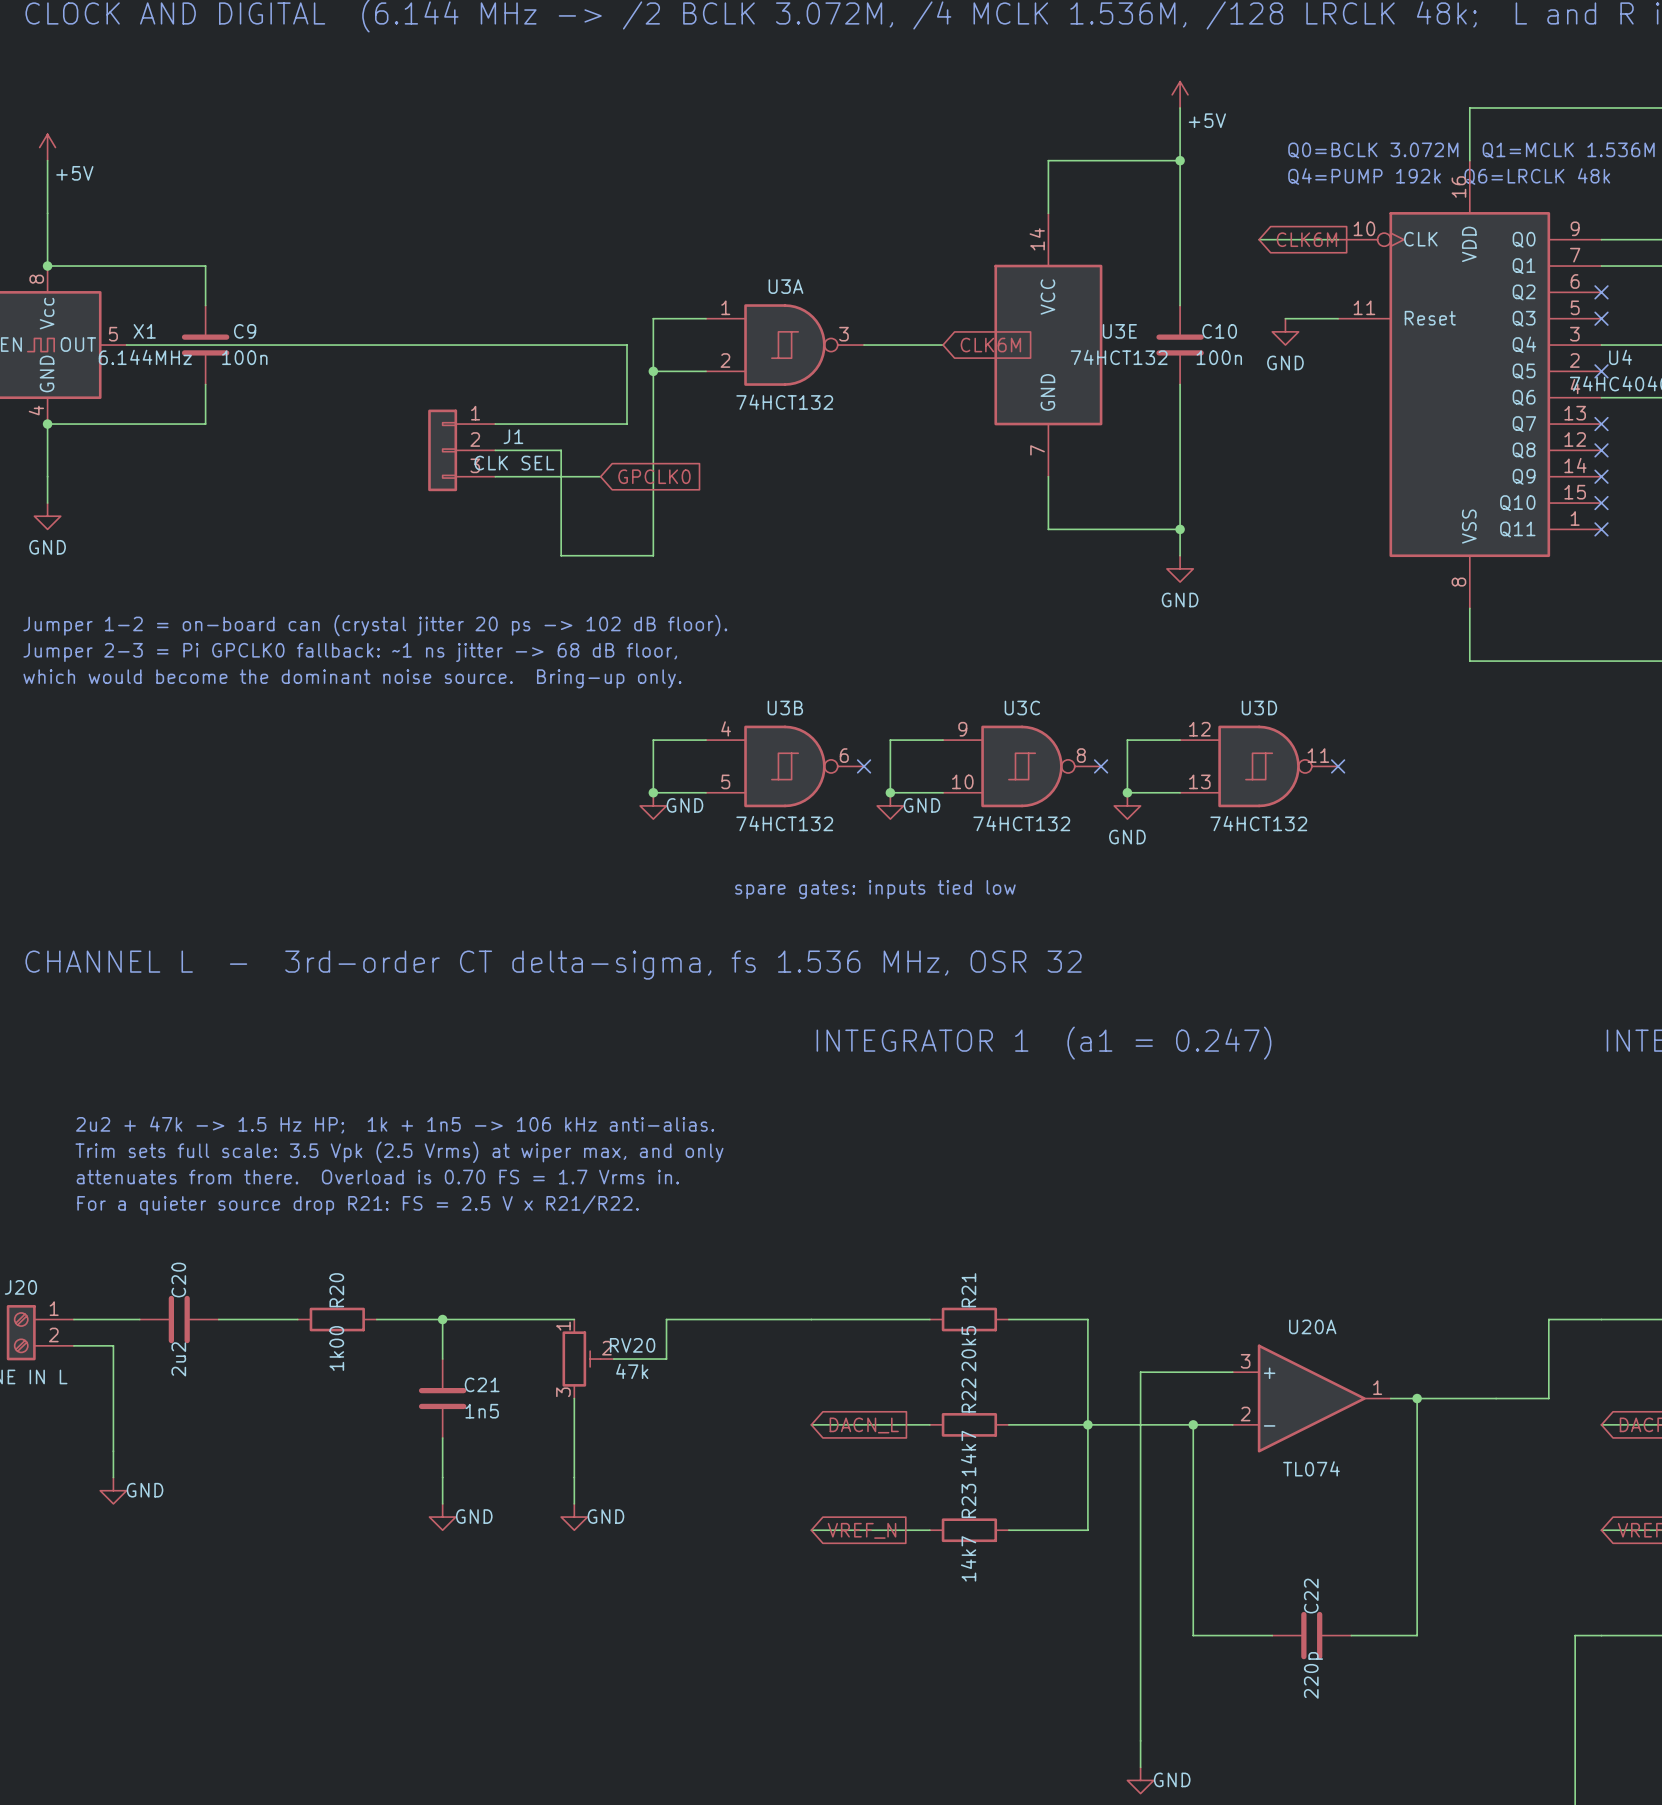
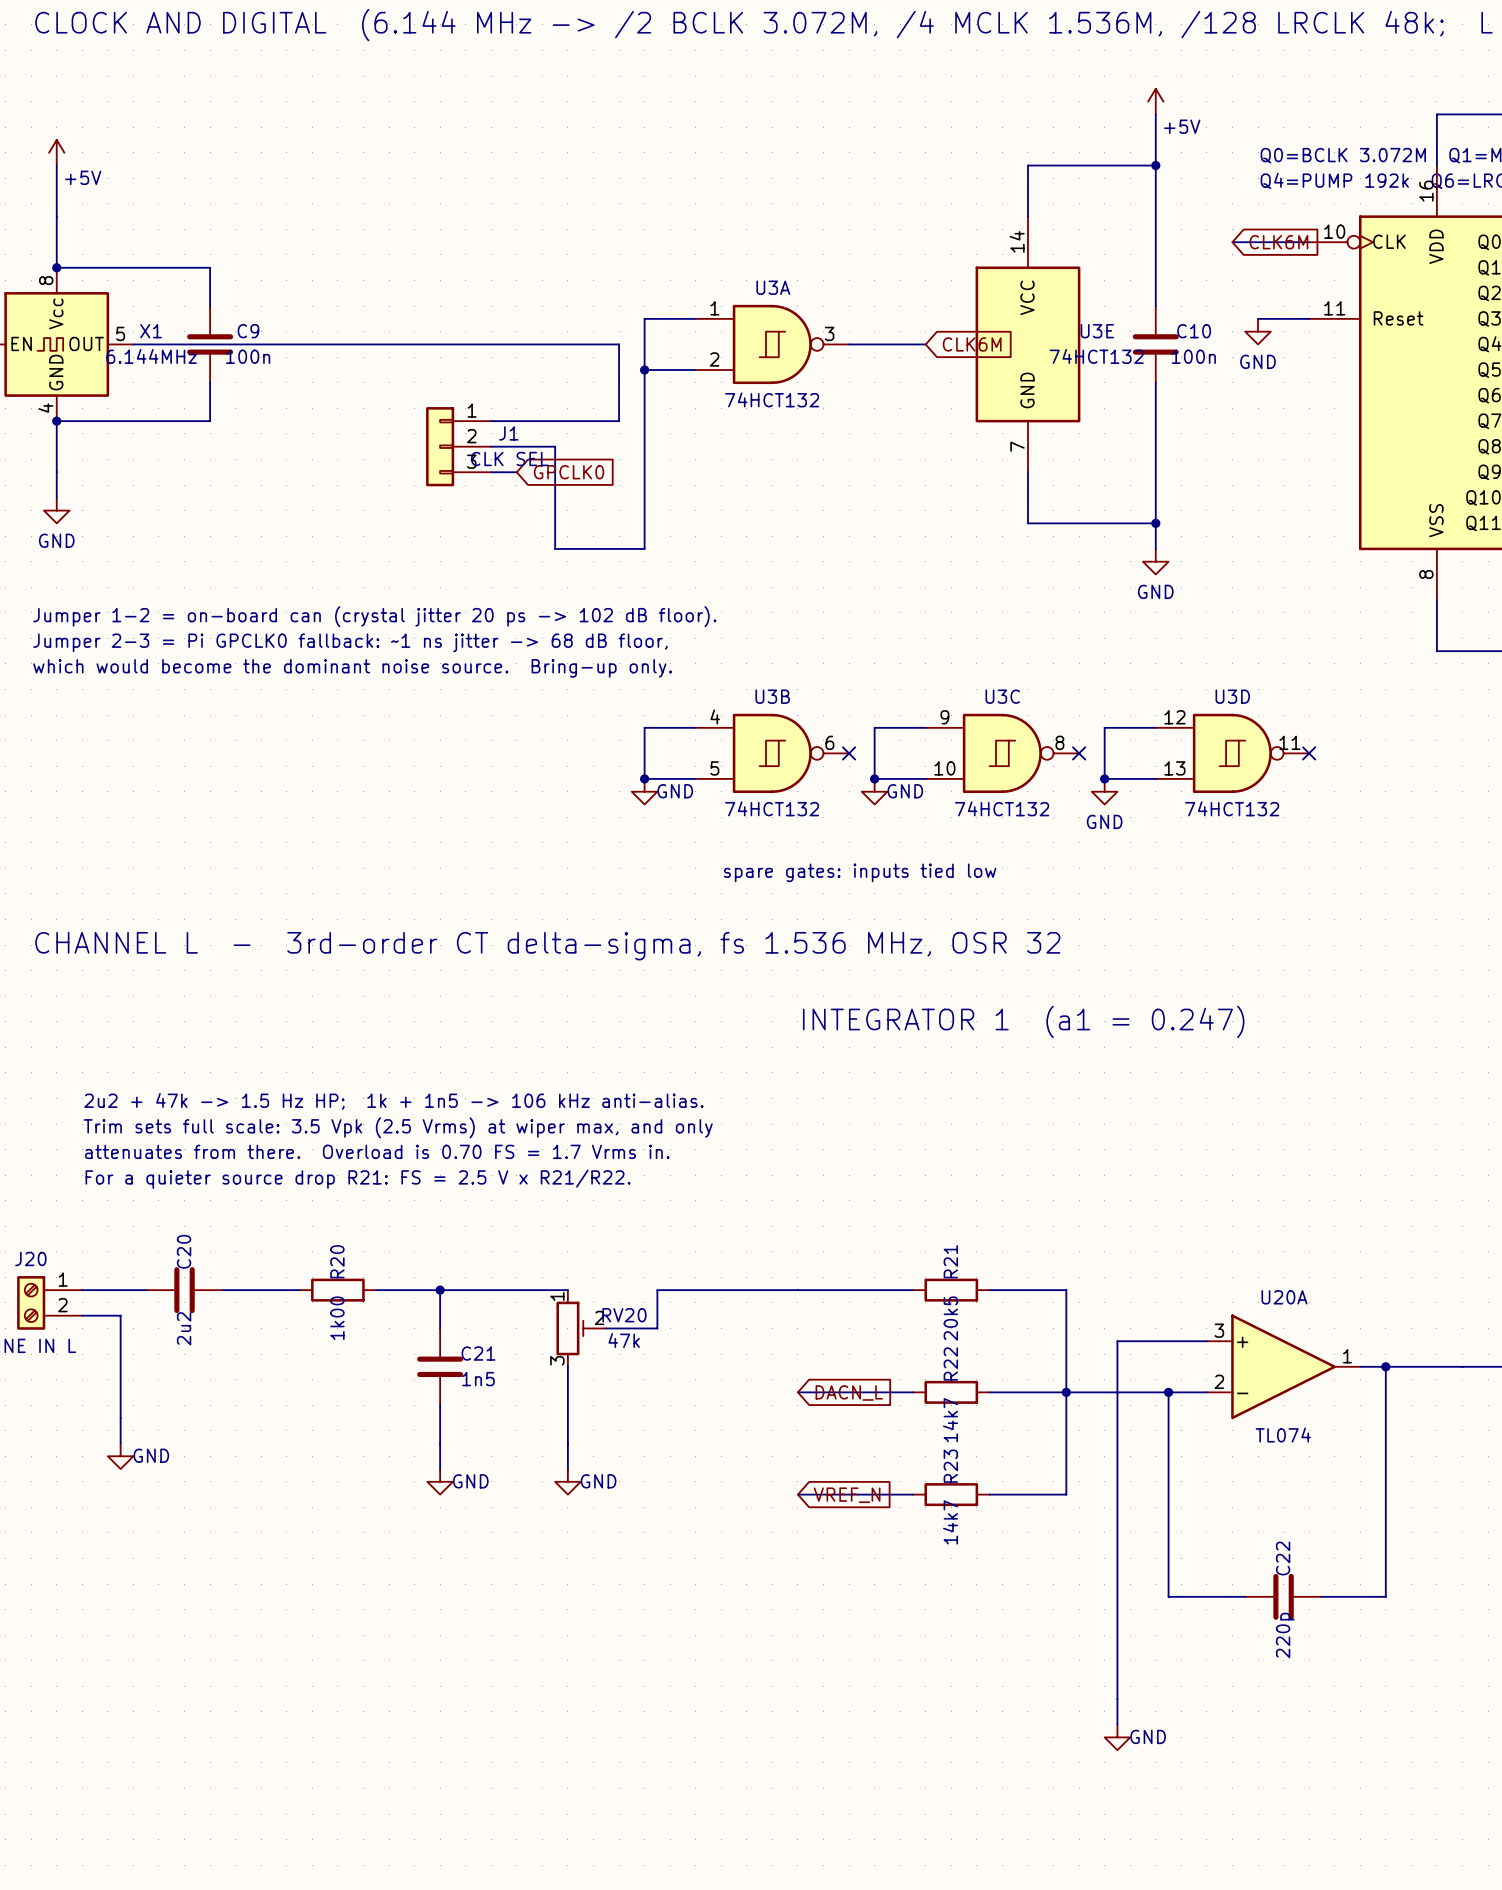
wire: (521, 476) (600, 476) -> none
global label position: GPCLK0 (654, 476) -> GPCLK0 (569, 472)

